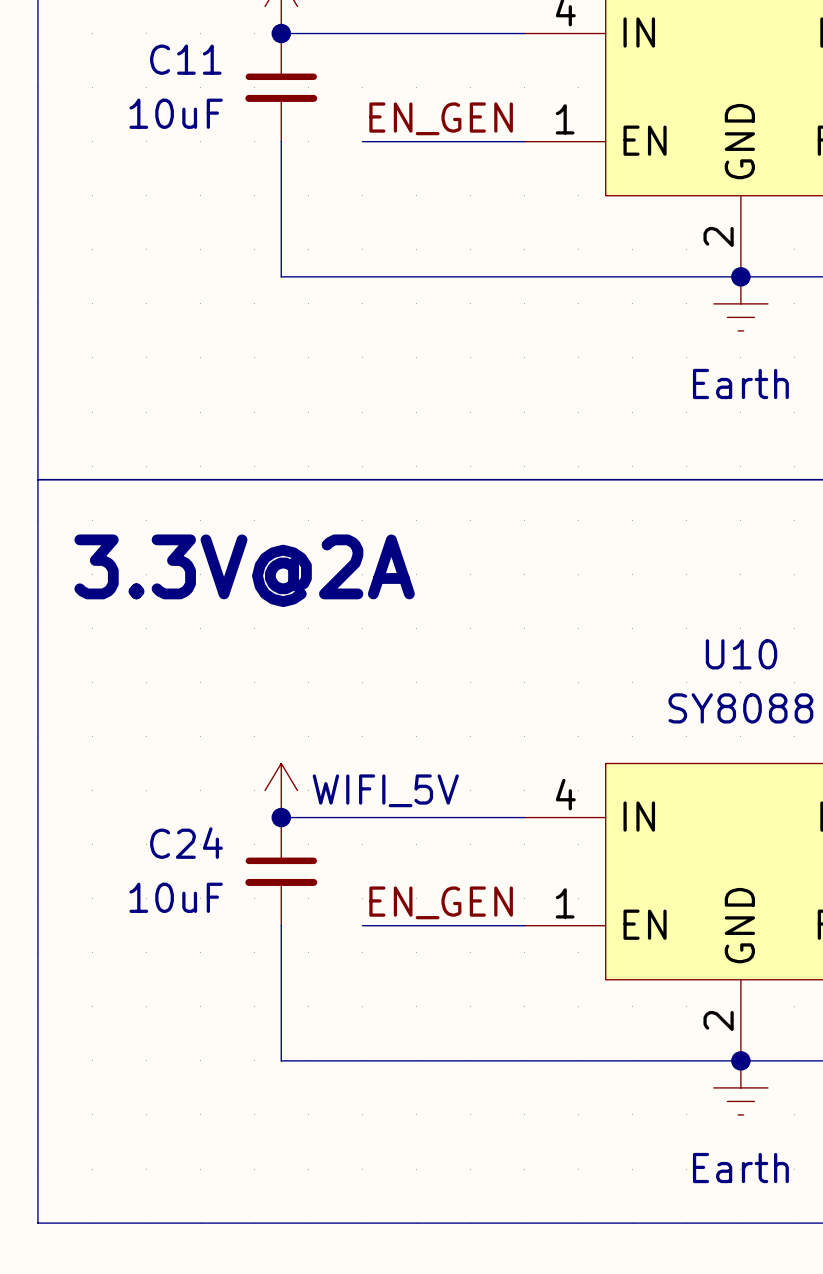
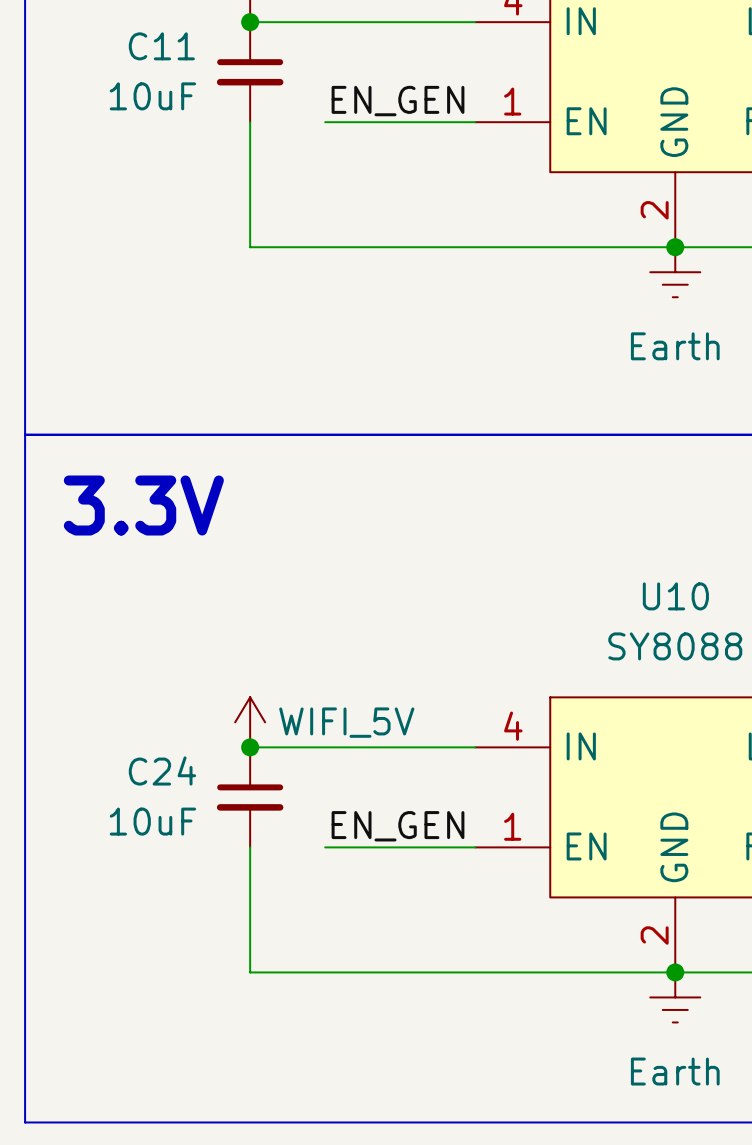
text: 3.3V@2A (244, 570) -> 3.3V (143, 505)

